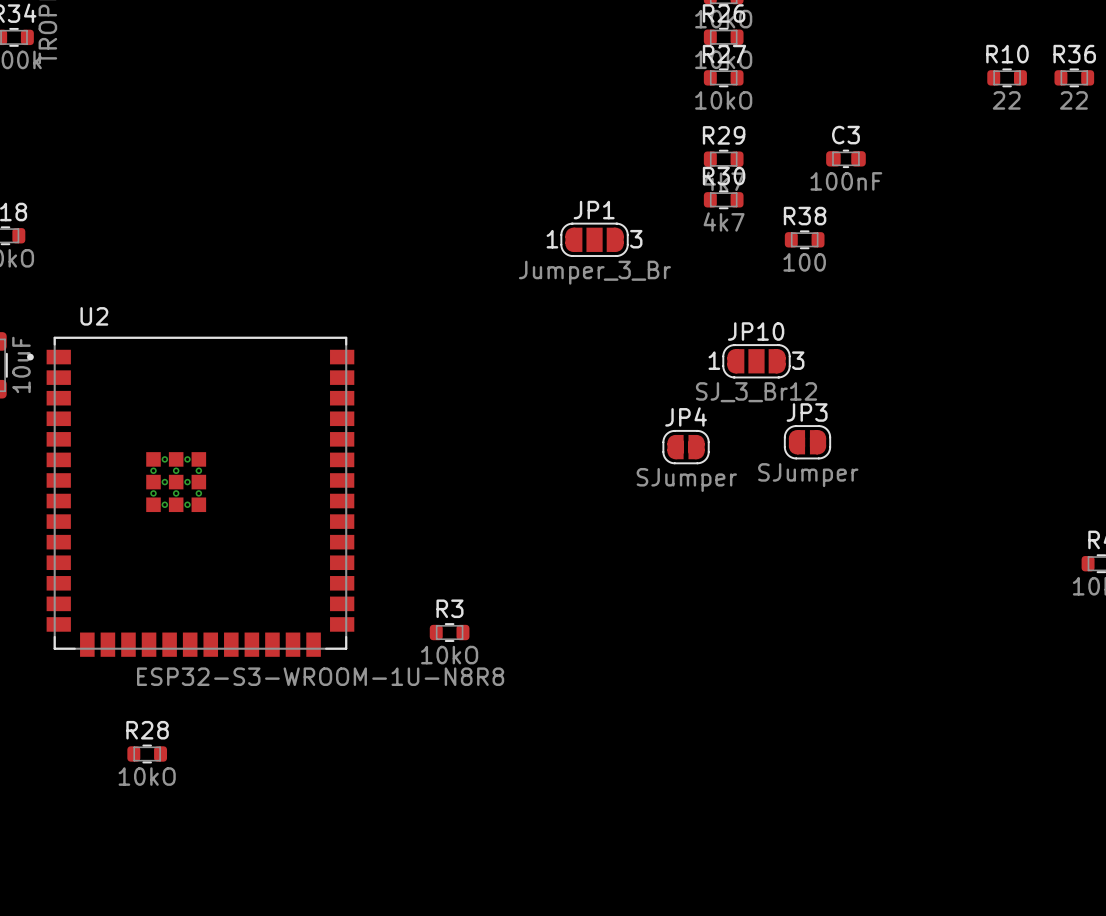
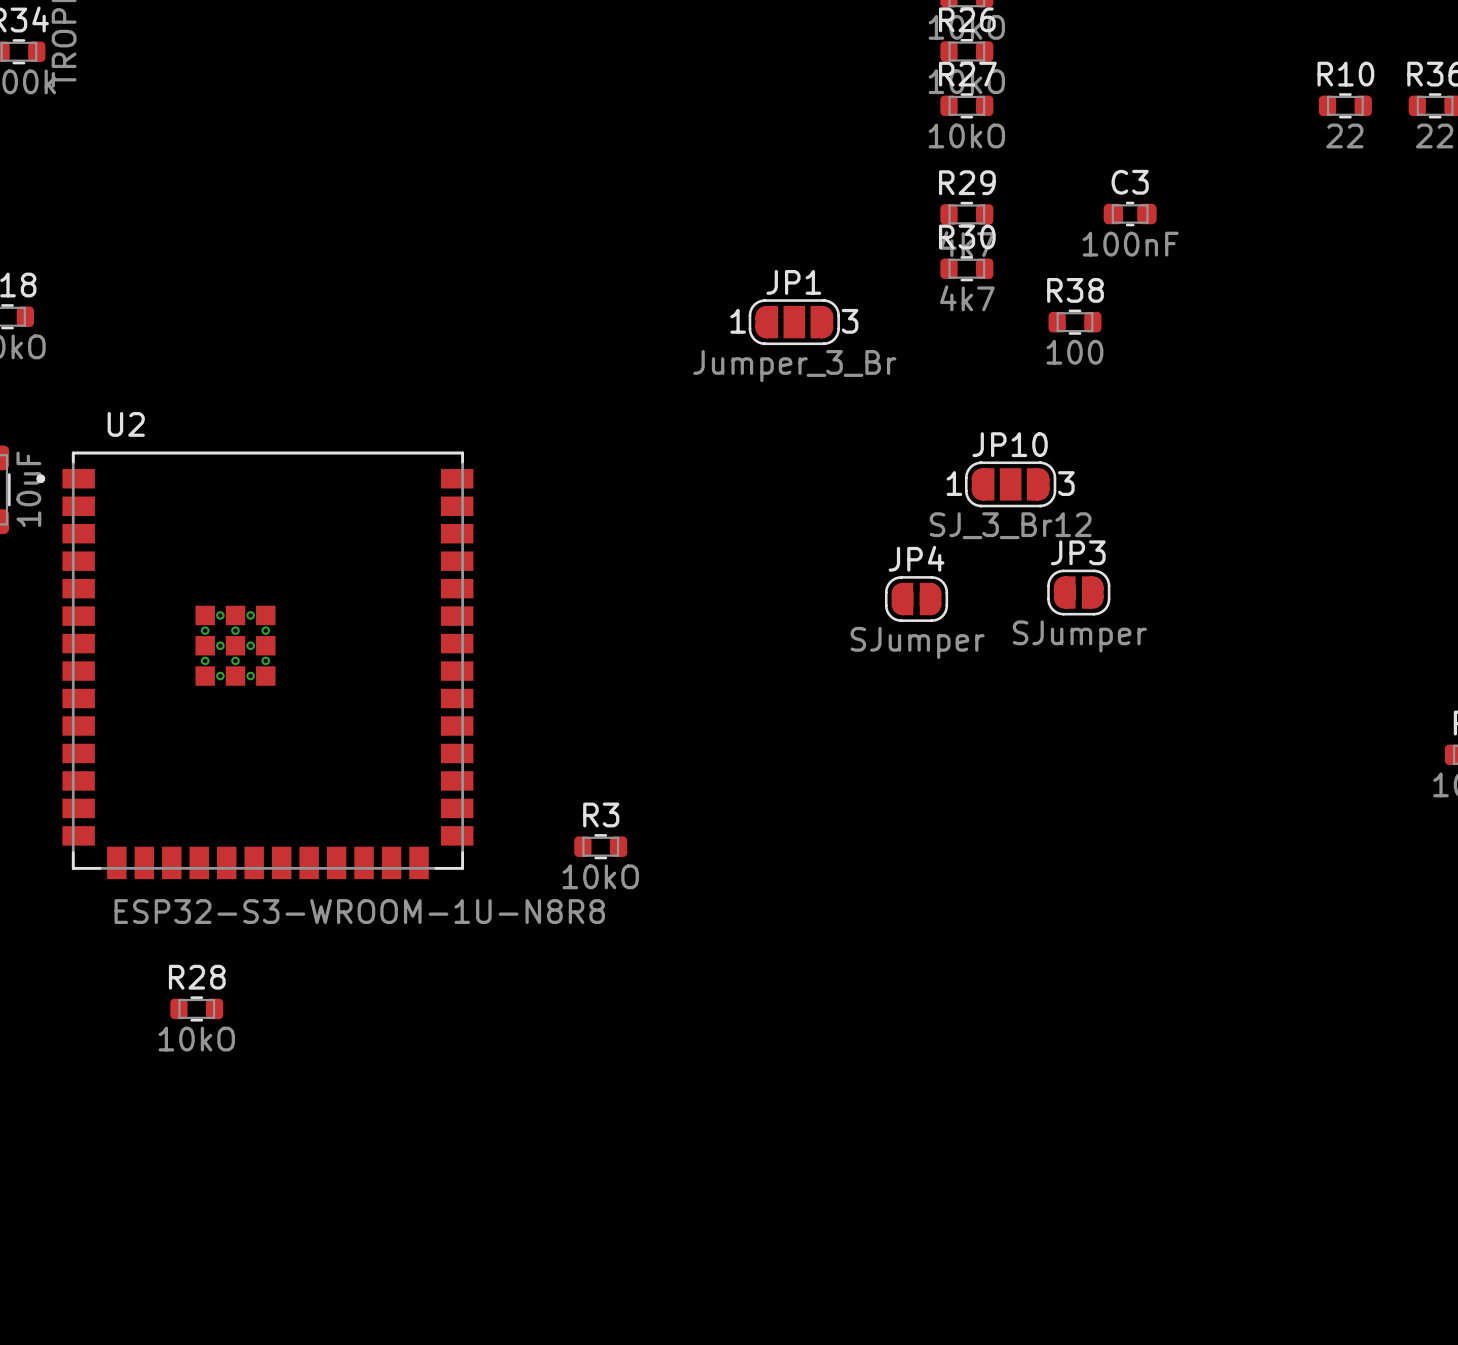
U2 value position: ESP32-S3-WROOM-1U-N8R8 (320, 676) -> ESP32-S3-WROOM-1U-N8R8 (359, 911)

